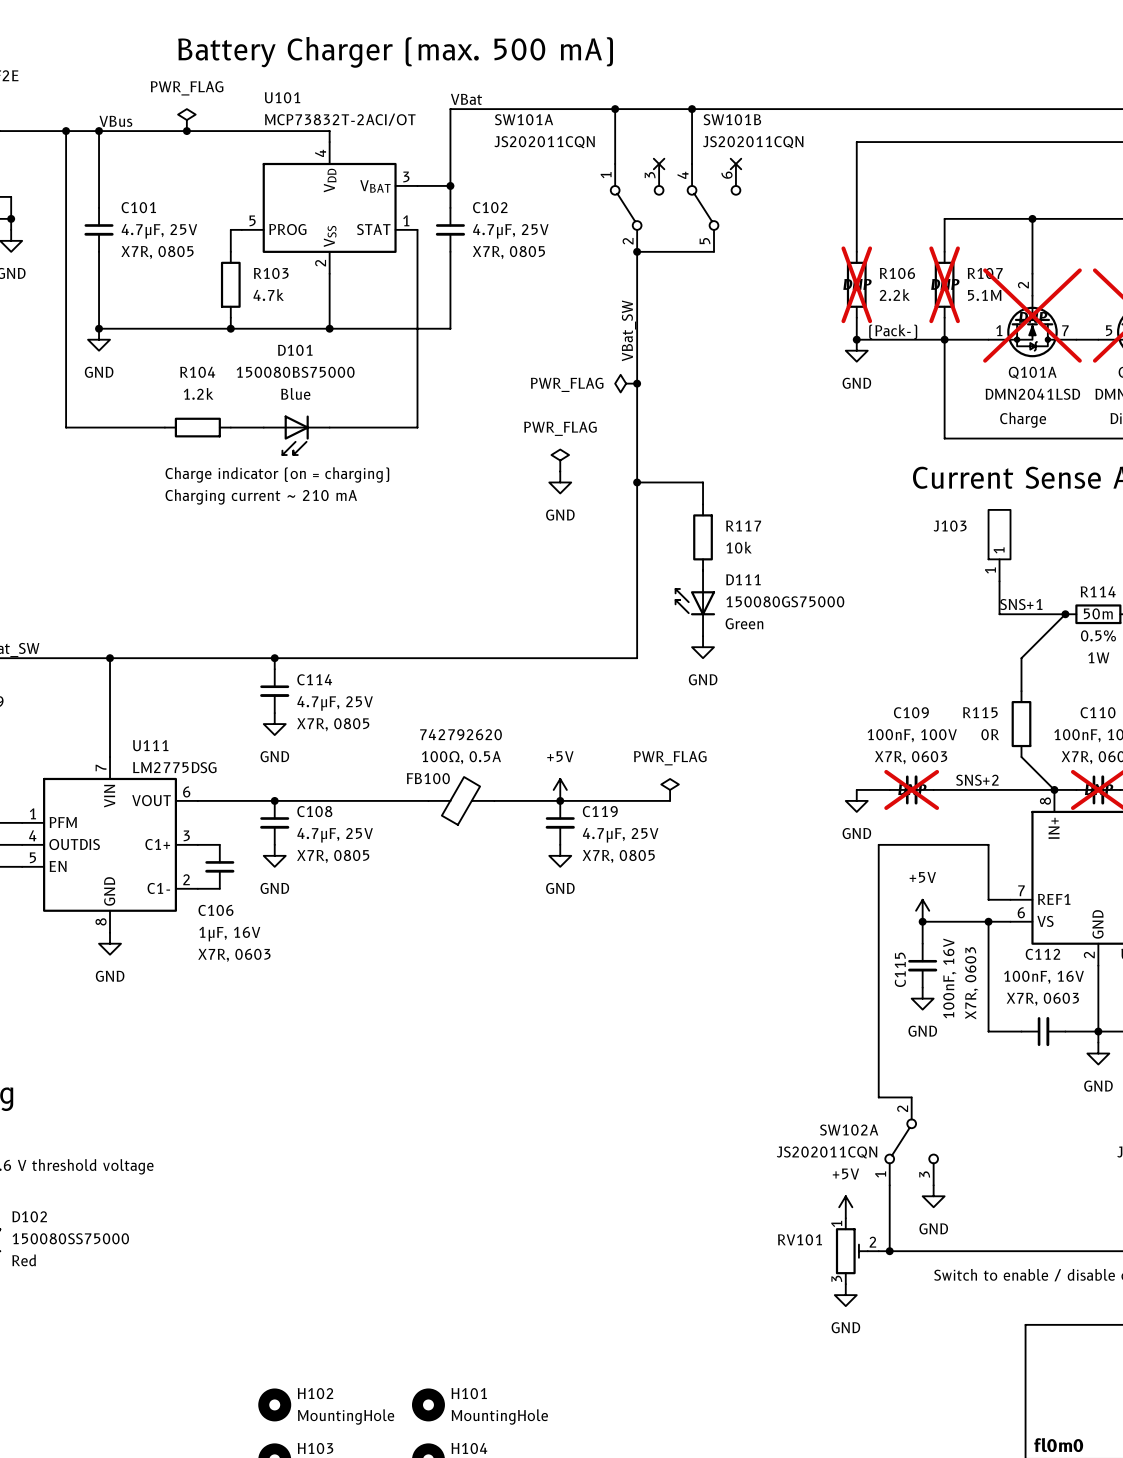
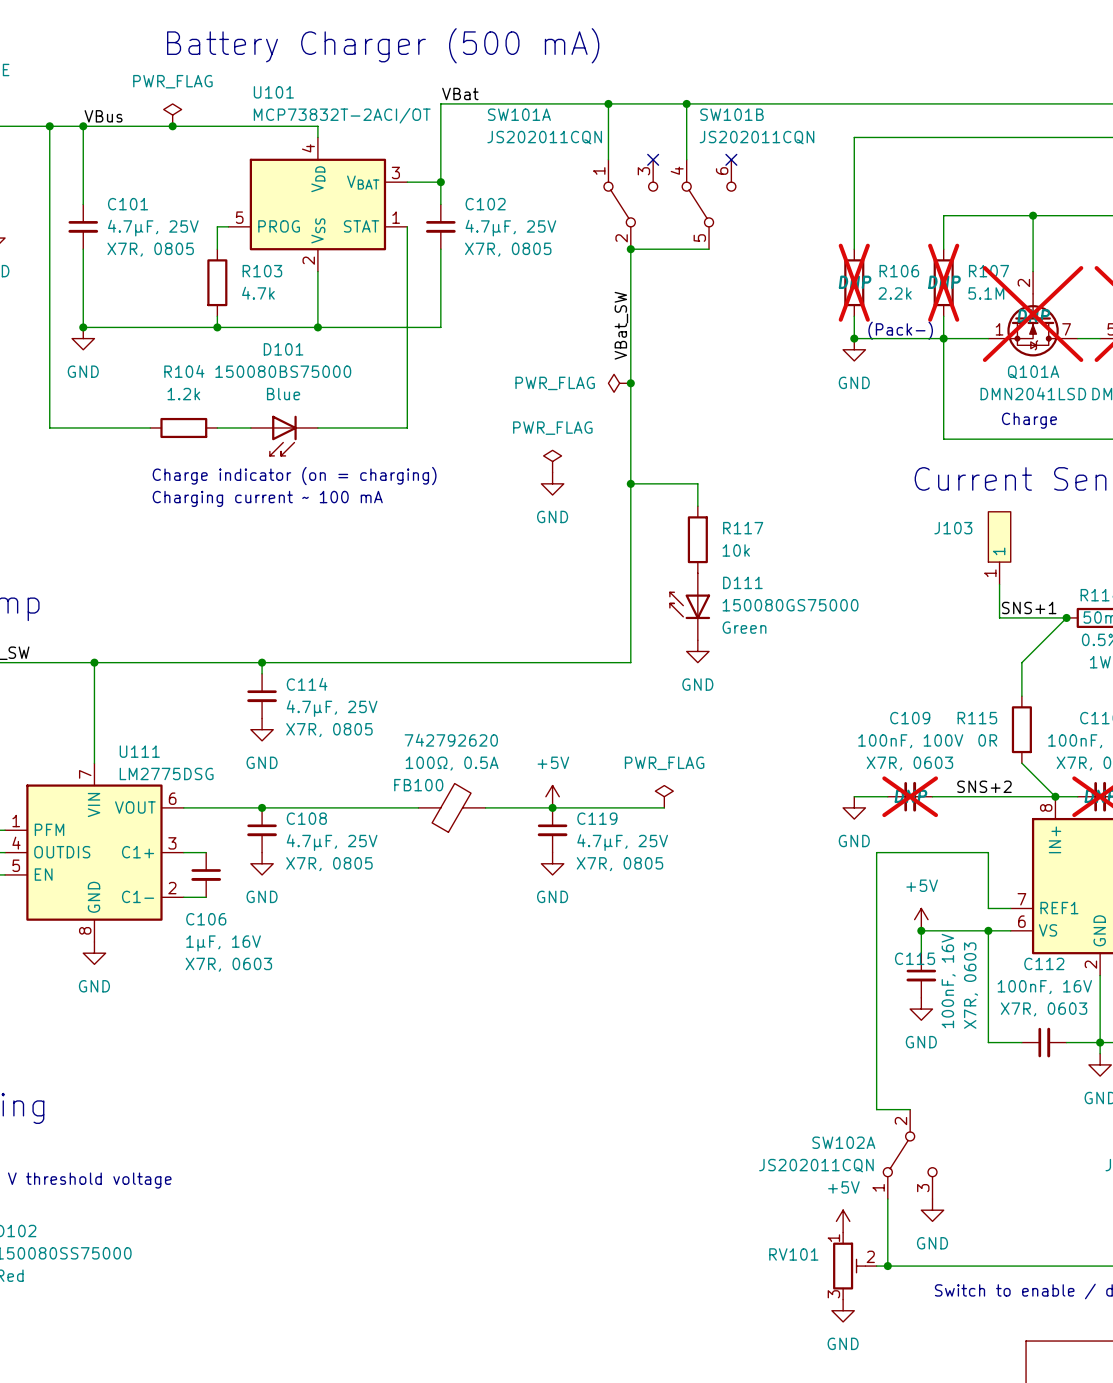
text: Battery Charger (max. 500 mA) (395, 52) -> Battery Charger (500 mA) (383, 45)
text: Charging current ~ 210 mA (261, 496) -> Charging current ~ 100 mA (267, 498)
C115 name rotation: 0° (900, 969) -> 90° clockwise (915, 958)

